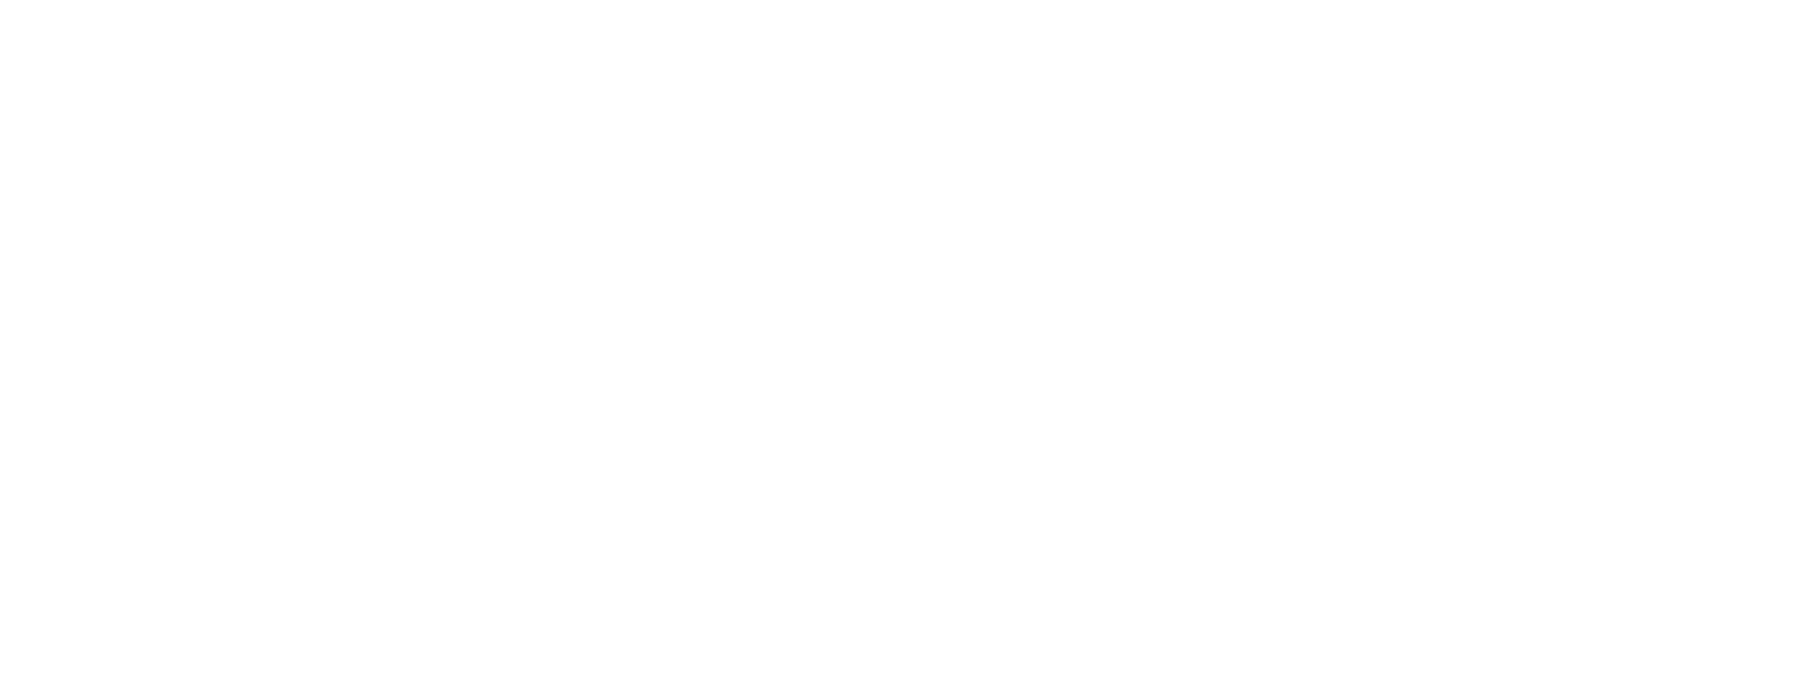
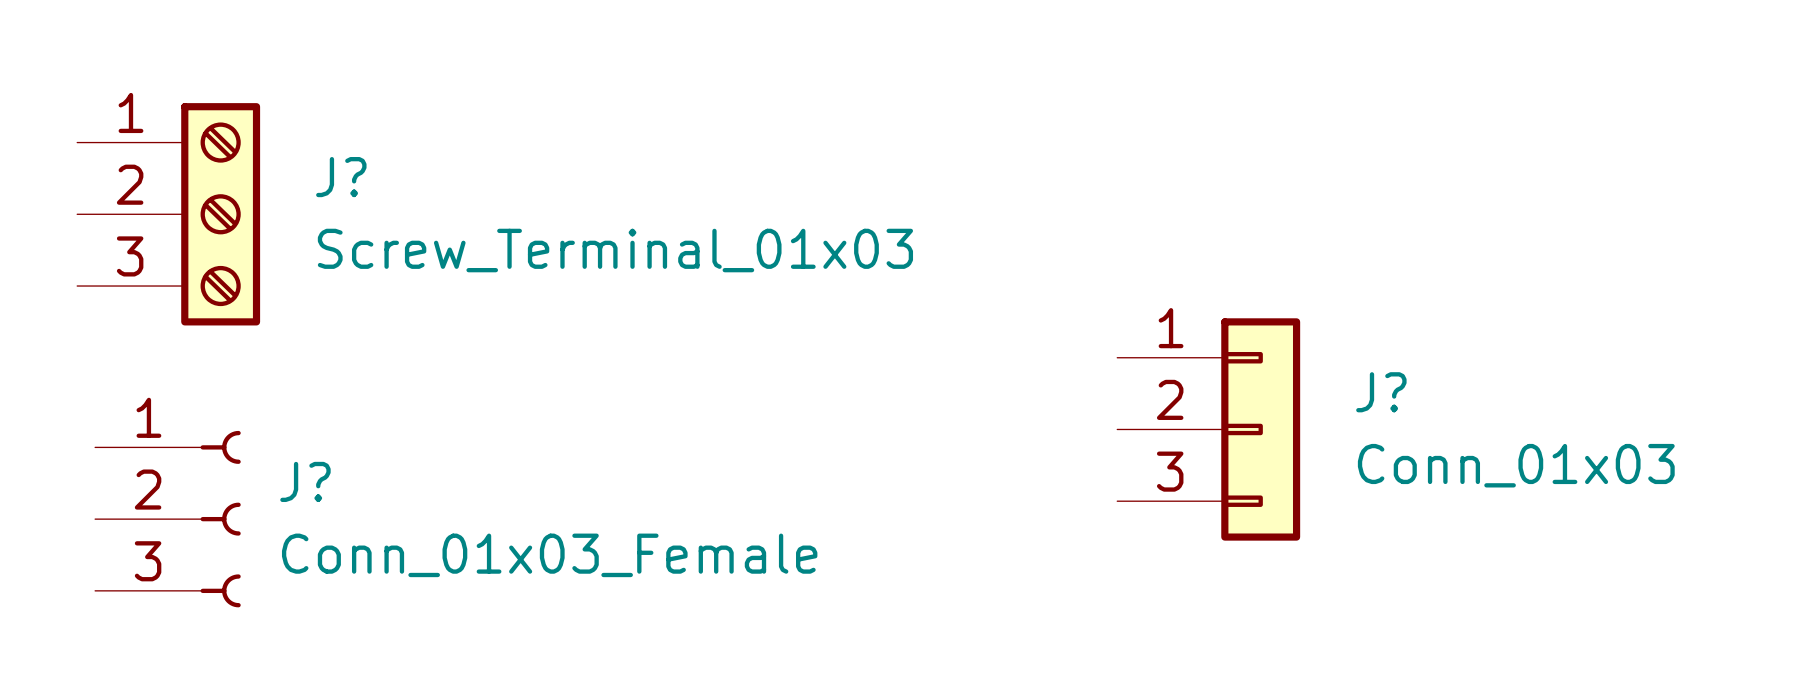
J?: none -> Screw_Terminal_01x03 (168, 214)
J?: none -> Conn_01x03 (1208, 429)
J?: none -> Conn_01x03_Female (167, 519)

